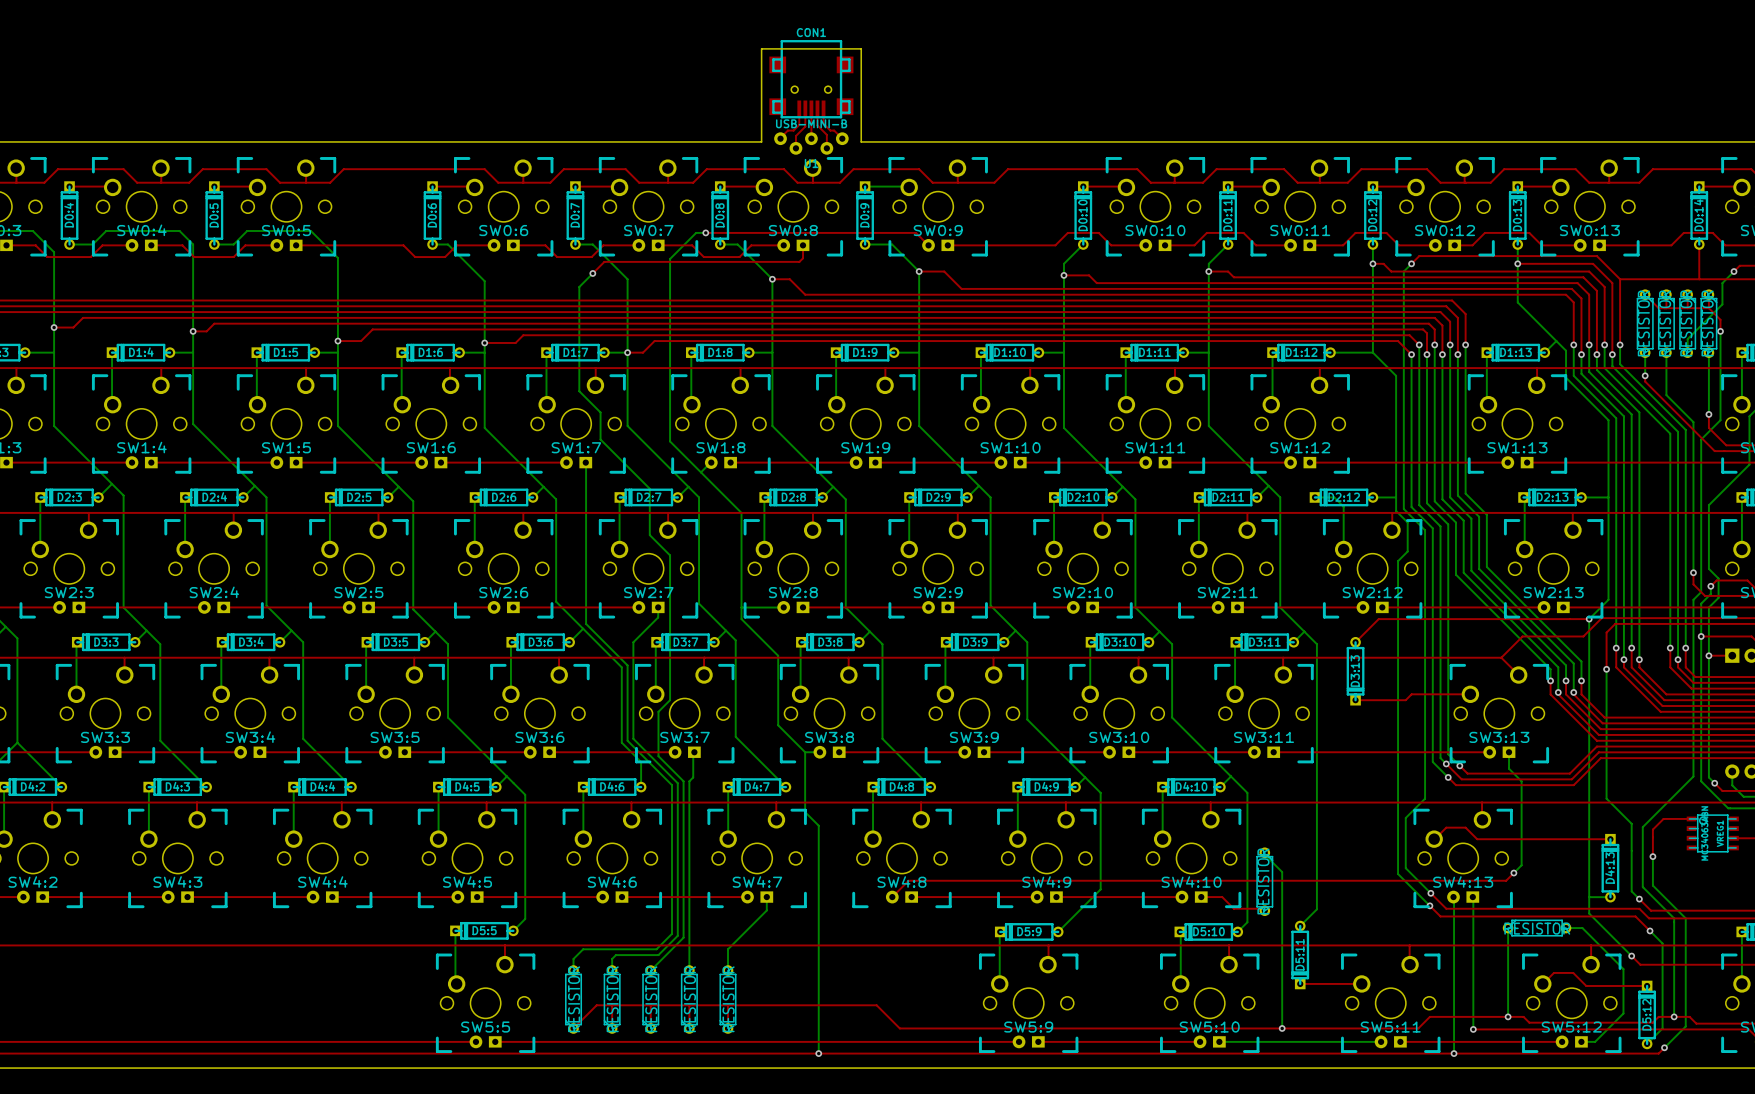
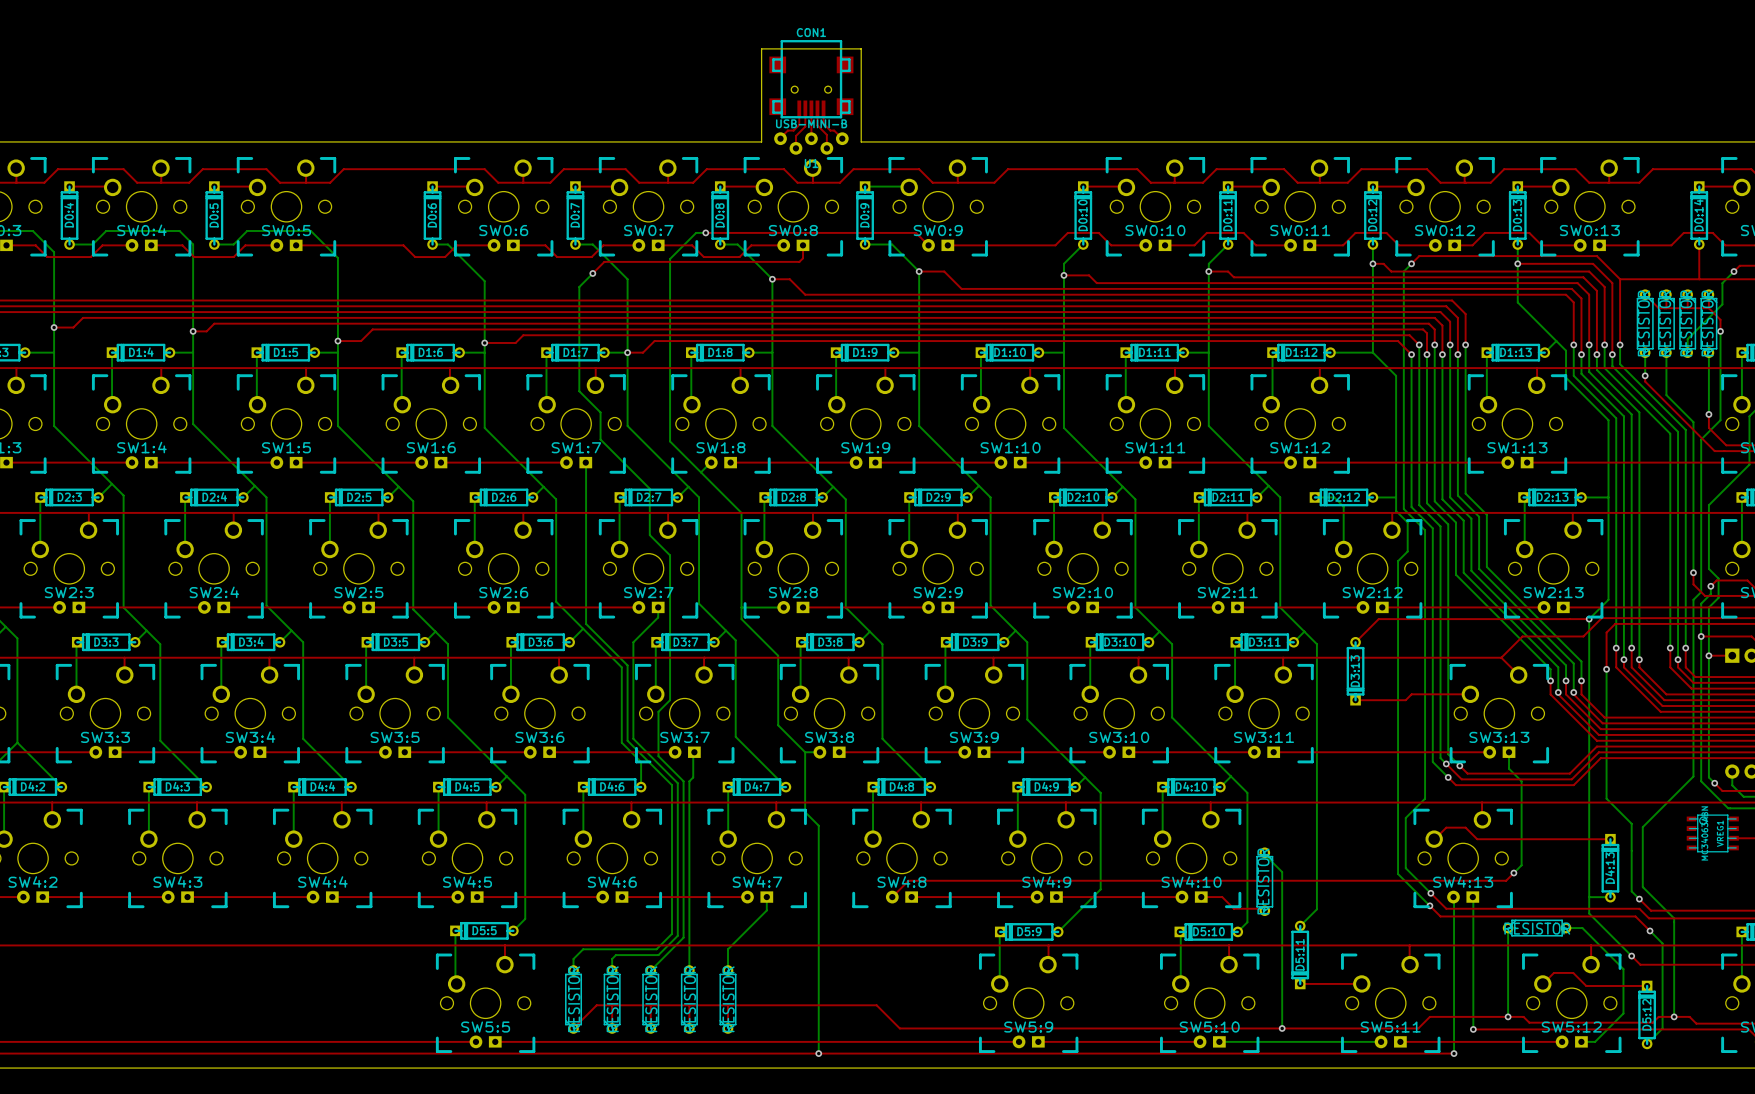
top track: (1691, 818) (1663, 818) (1652, 829) (1652, 856) -> none
bottom track: (1652, 856) (1652, 885) (1685, 918) (1685, 1026) (1664, 1047) -> none
via: (1652, 856) -> none
top track: (1664, 1047) (1658, 1053) (1454, 1053) -> none
via: (1664, 1047) -> none

